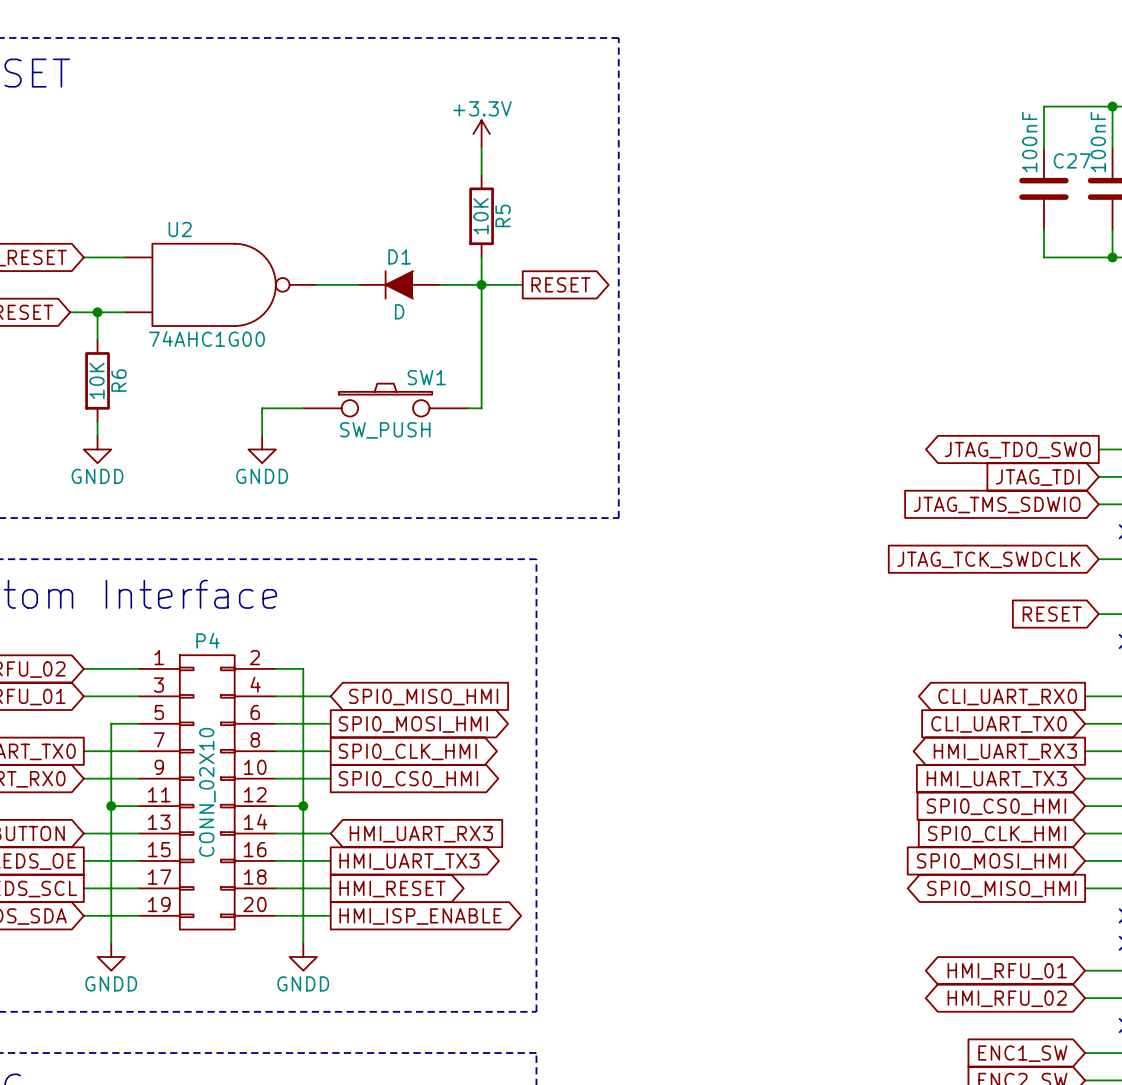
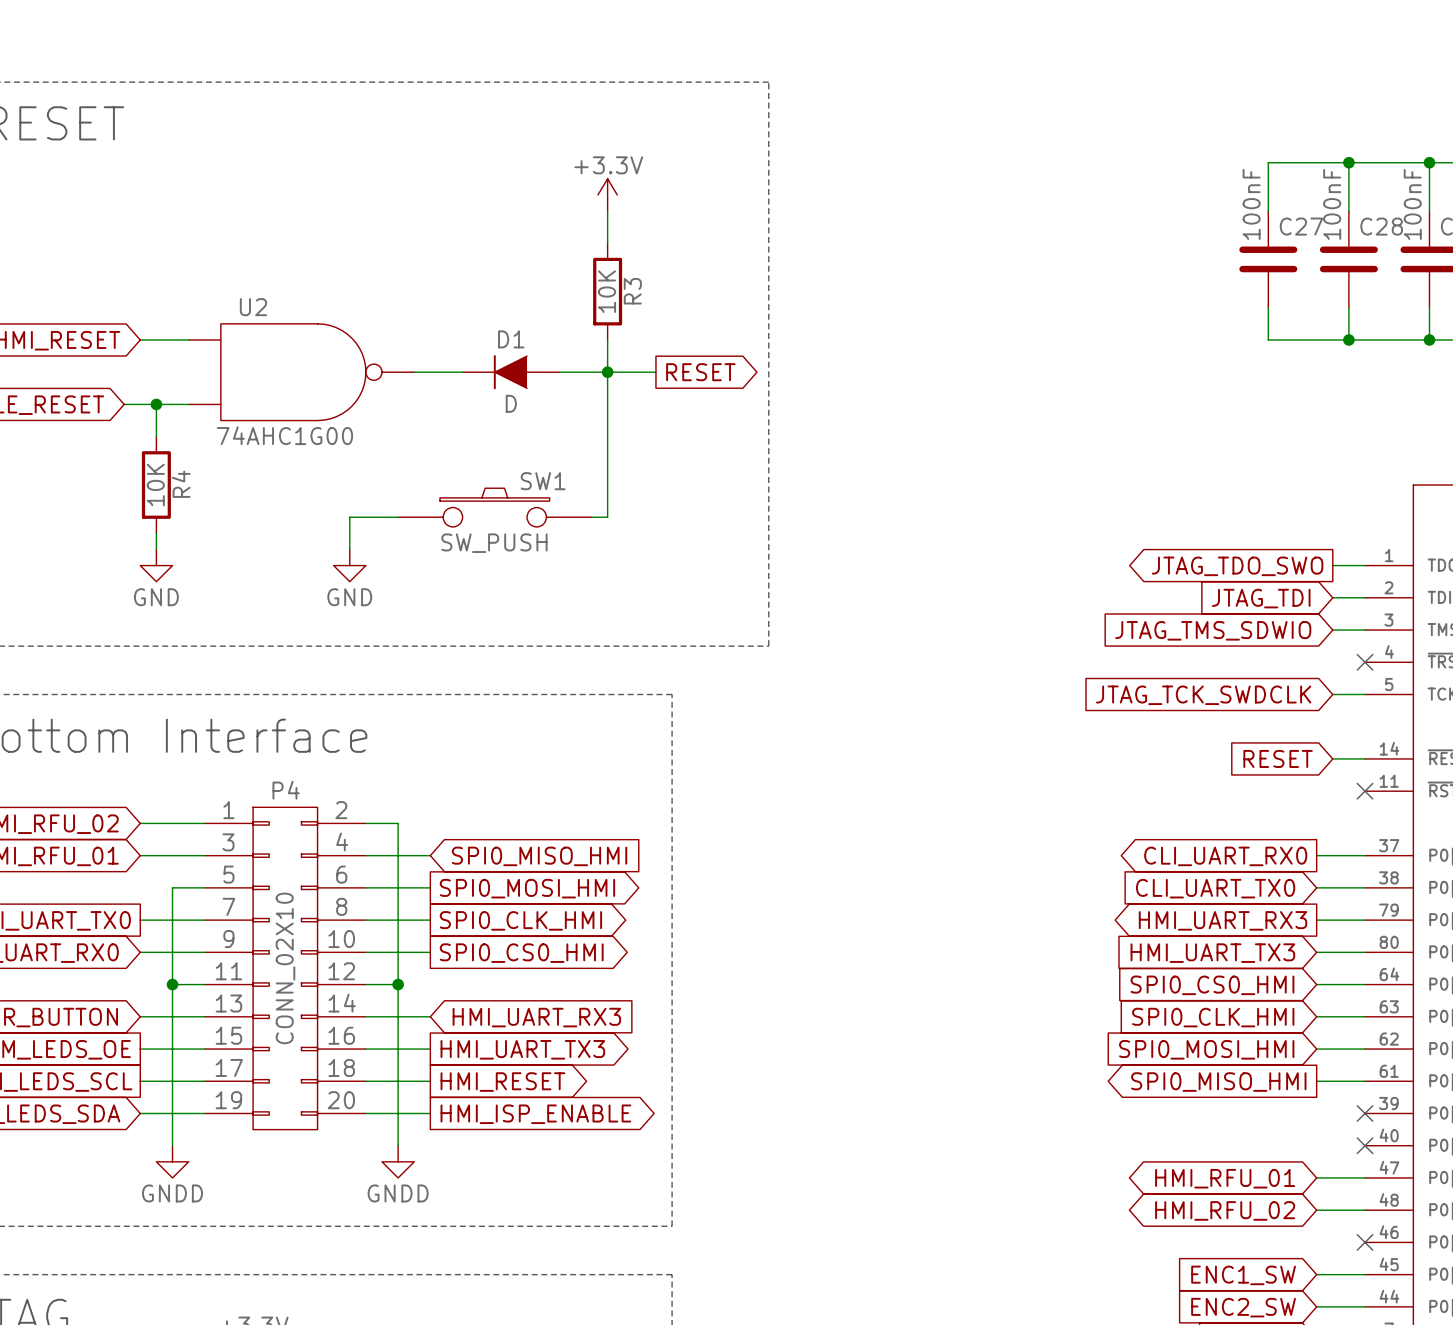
R5 name: R5 (503, 215) -> R3 (632, 291)
R6 name: R6 (118, 380) -> R4 (181, 484)
power symbol: GNDD (97, 449) -> GND (156, 565)
power symbol: GNDD (262, 449) -> GND (349, 565)

